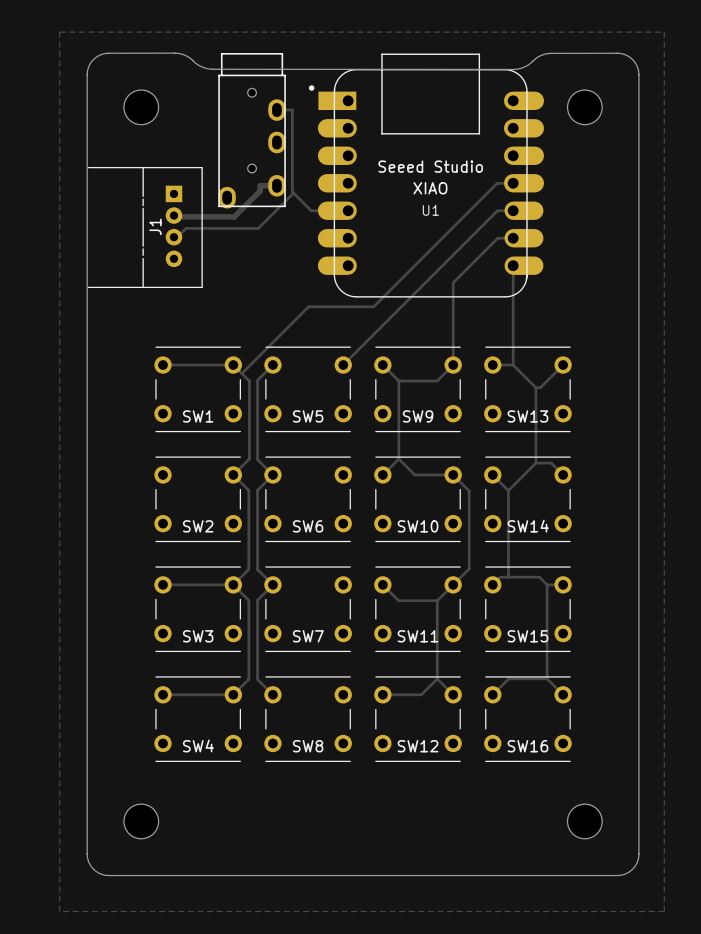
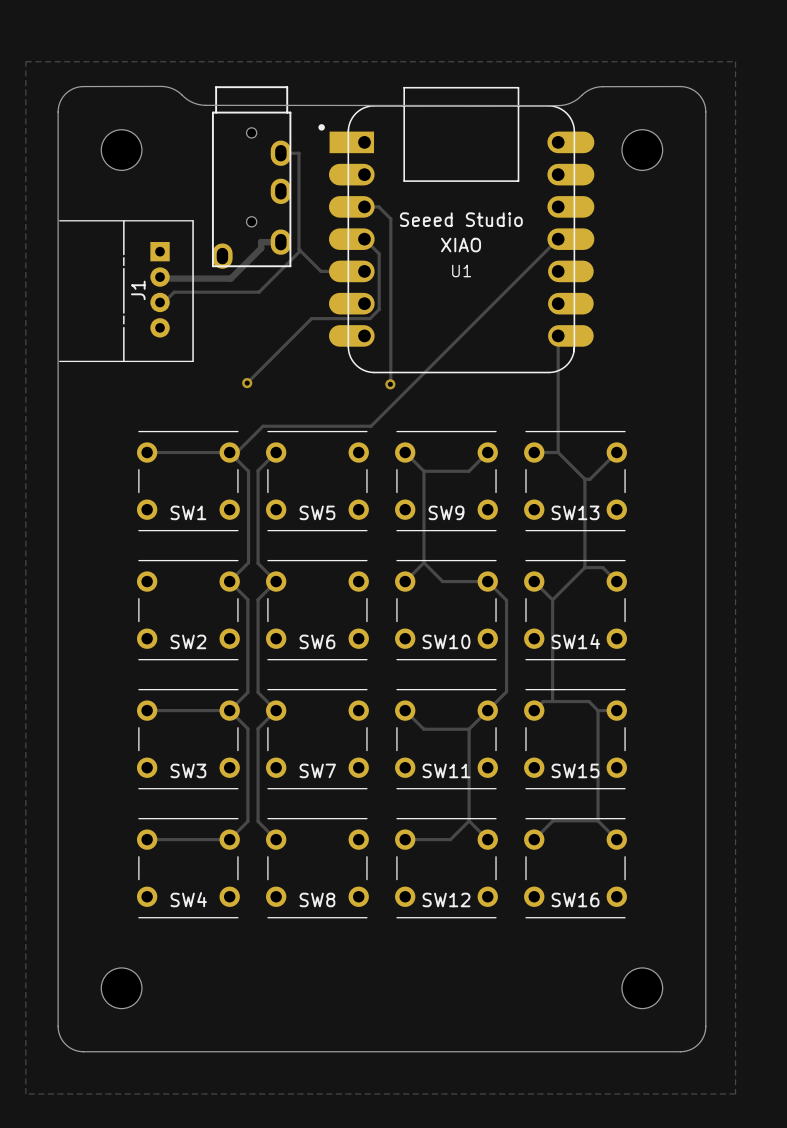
track: none -> (364, 206) (378, 206) (390, 218) (390, 384)
track: none -> (364, 239) (379, 253) (379, 309) (370, 318) (311, 318) (247, 383)
track: (513, 183) (497, 183) (373, 306) (308, 306) (241, 373) -> (558, 239) (371, 426) (263, 426) (237, 451) (237, 460)
track: (513, 210) (497, 210) (343, 365) -> none
track: (513, 238) (497, 238) (453, 282) (453, 365) -> none
via: none -> (247, 383)
via: none -> (390, 384)

